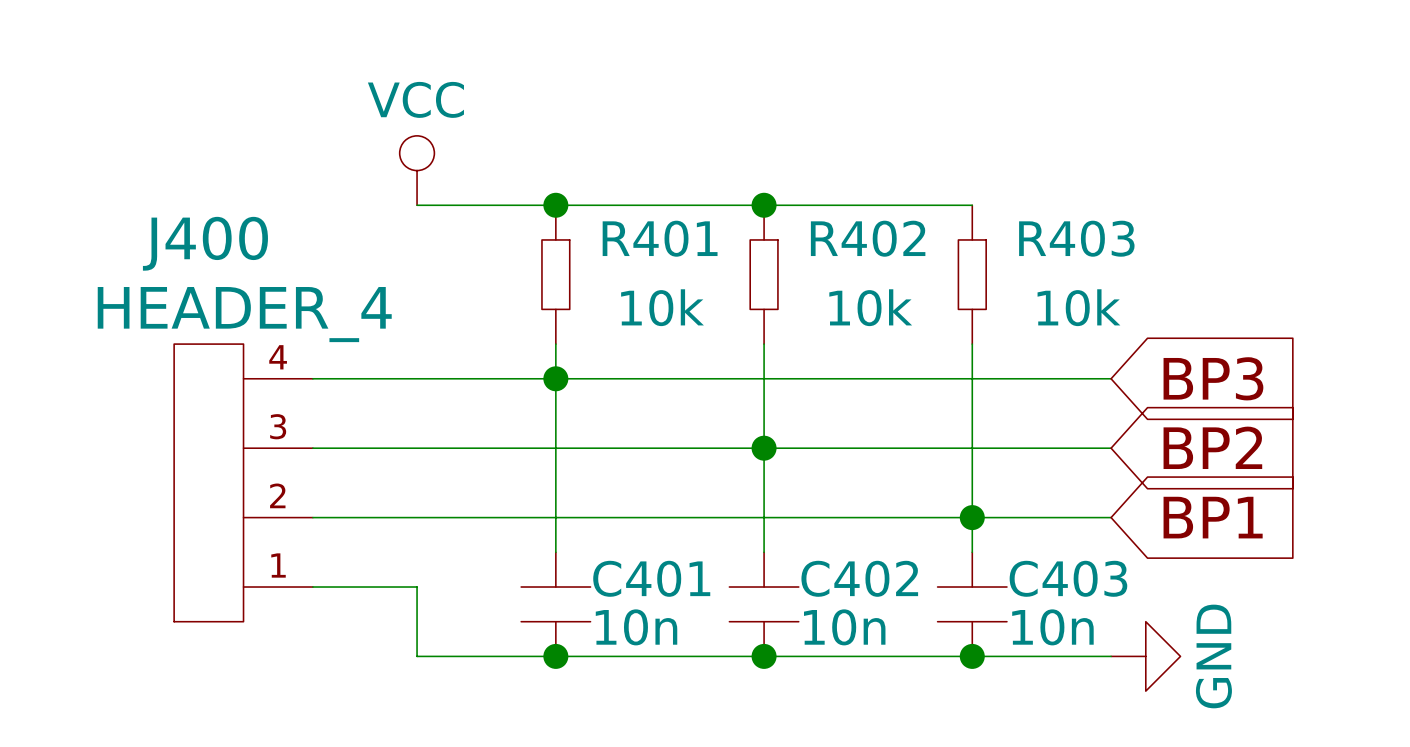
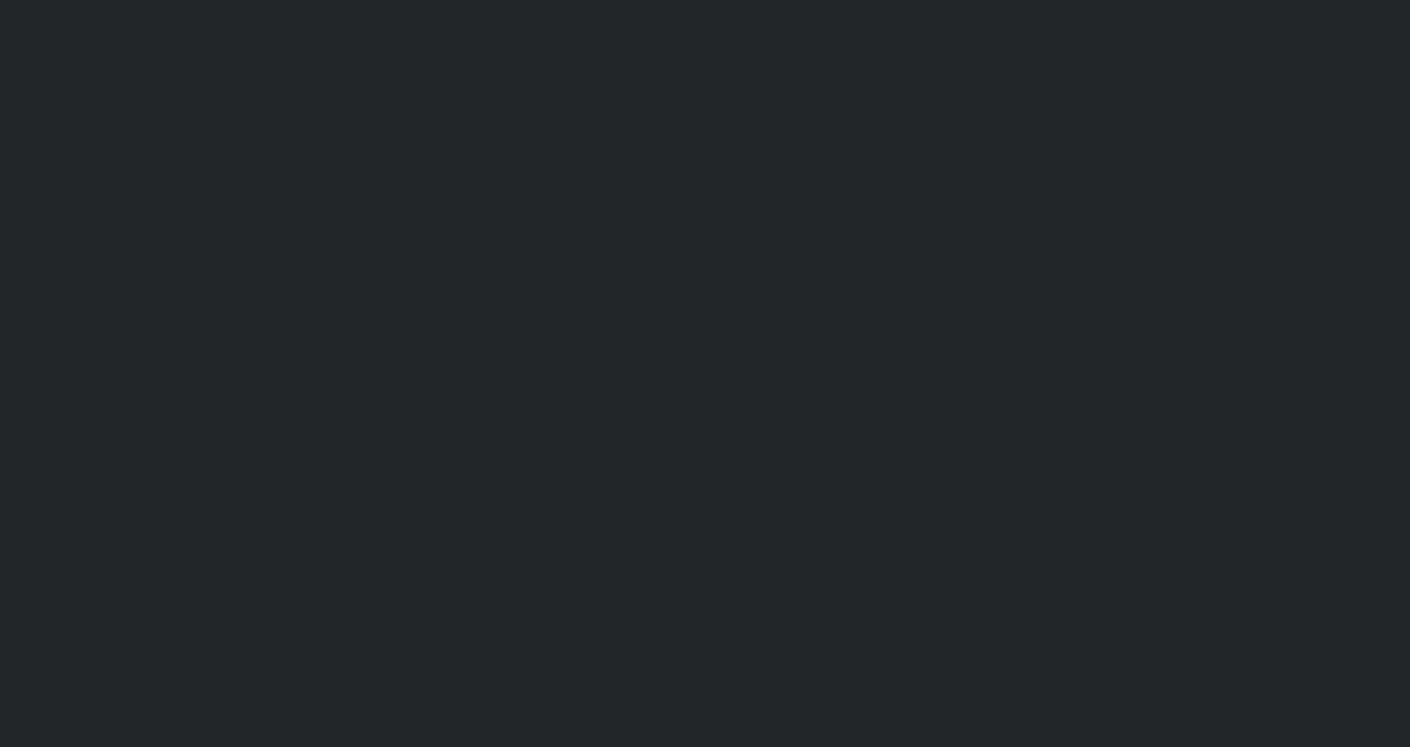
power symbol: VCC (417, 170) -> none
wire: (417, 205) (972, 205) -> none
junction: (555, 205) -> none
junction: (764, 205) -> none
R401: 10k (555, 274) -> none
R402: 10k (764, 274) -> none
R403: 10k (972, 274) -> none
wire: (555, 344) (555, 552) -> none
wire: (764, 344) (764, 552) -> none
wire: (972, 344) (972, 552) -> none
wire: (312, 378) (1111, 378) -> none
junction: (555, 378) -> none
global label: BP3 (1213, 378) -> none
global label: BP2 (1212, 447) -> none
wire: (312, 448) (1111, 448) -> none
junction: (764, 448) -> none
J400: HEADER_4 (243, 482) -> none
wire: (312, 517) (1111, 517) -> none
junction: (972, 517) -> none
global label: BP1 (1213, 517) -> none
wire: (312, 587) (417, 587) (417, 656) (1111, 656) -> none
C401: 10n (555, 604) -> none
C402: 10n (764, 604) -> none
C403: 10n (972, 604) -> none
junction: (555, 656) -> none
junction: (764, 656) -> none
junction: (972, 656) -> none
power symbol: GND (1145, 656) -> none

